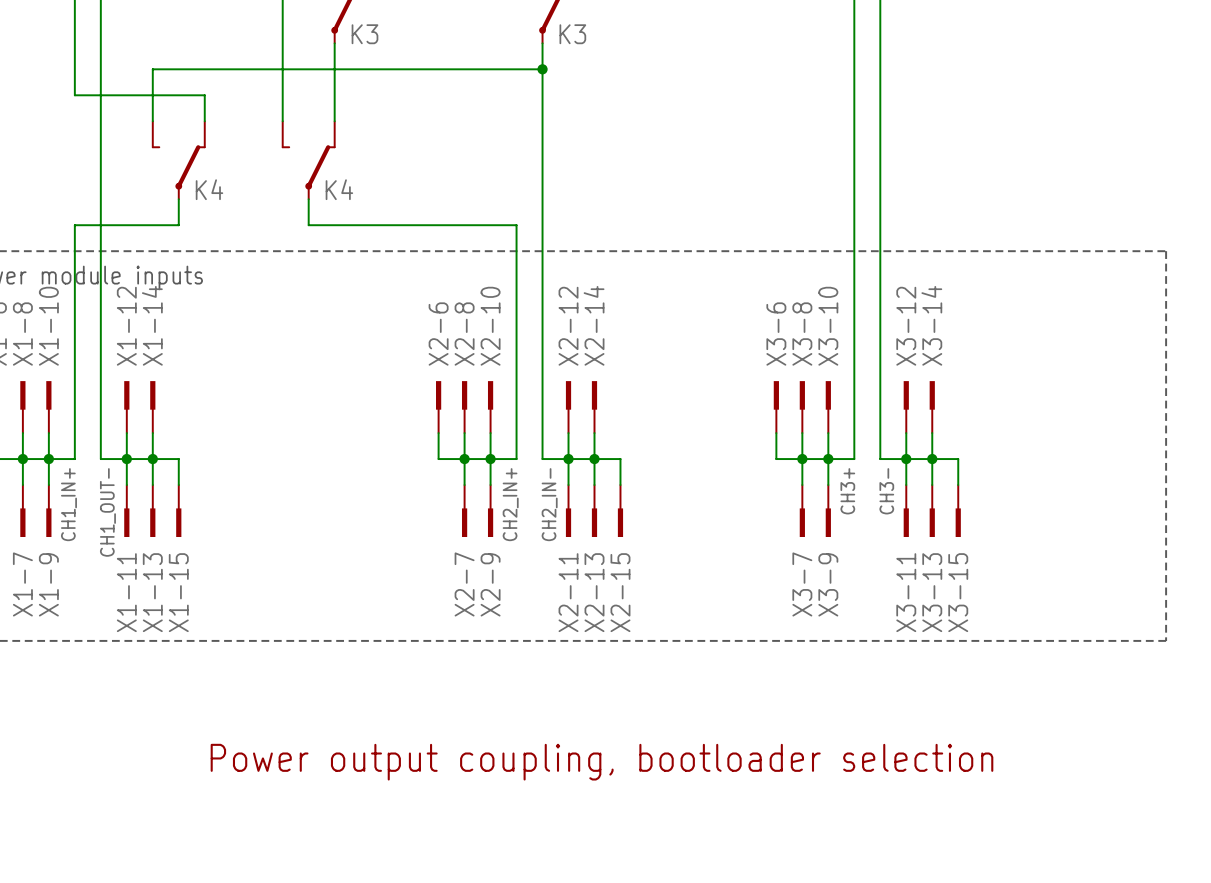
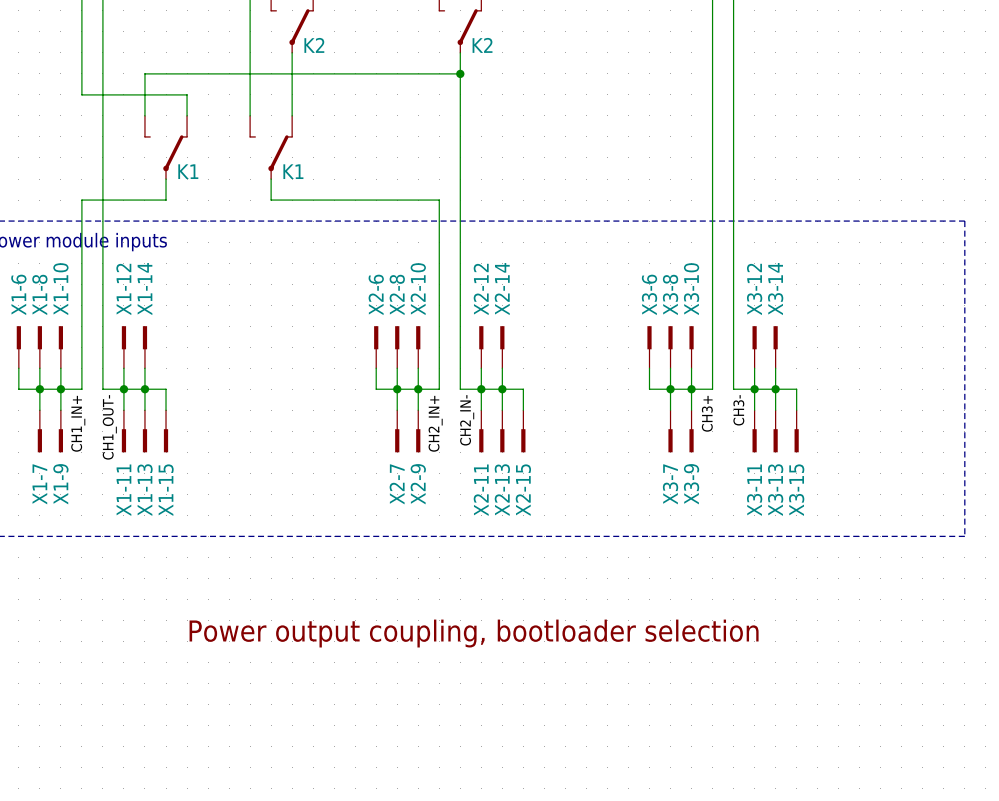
K3 name: K3 (364, 34) -> K2 (314, 45)
K3 name: K3 (572, 34) -> K2 (482, 45)
K4 name: K4 (209, 189) -> K1 (188, 171)
K4 name: K4 (339, 189) -> K1 (293, 171)

